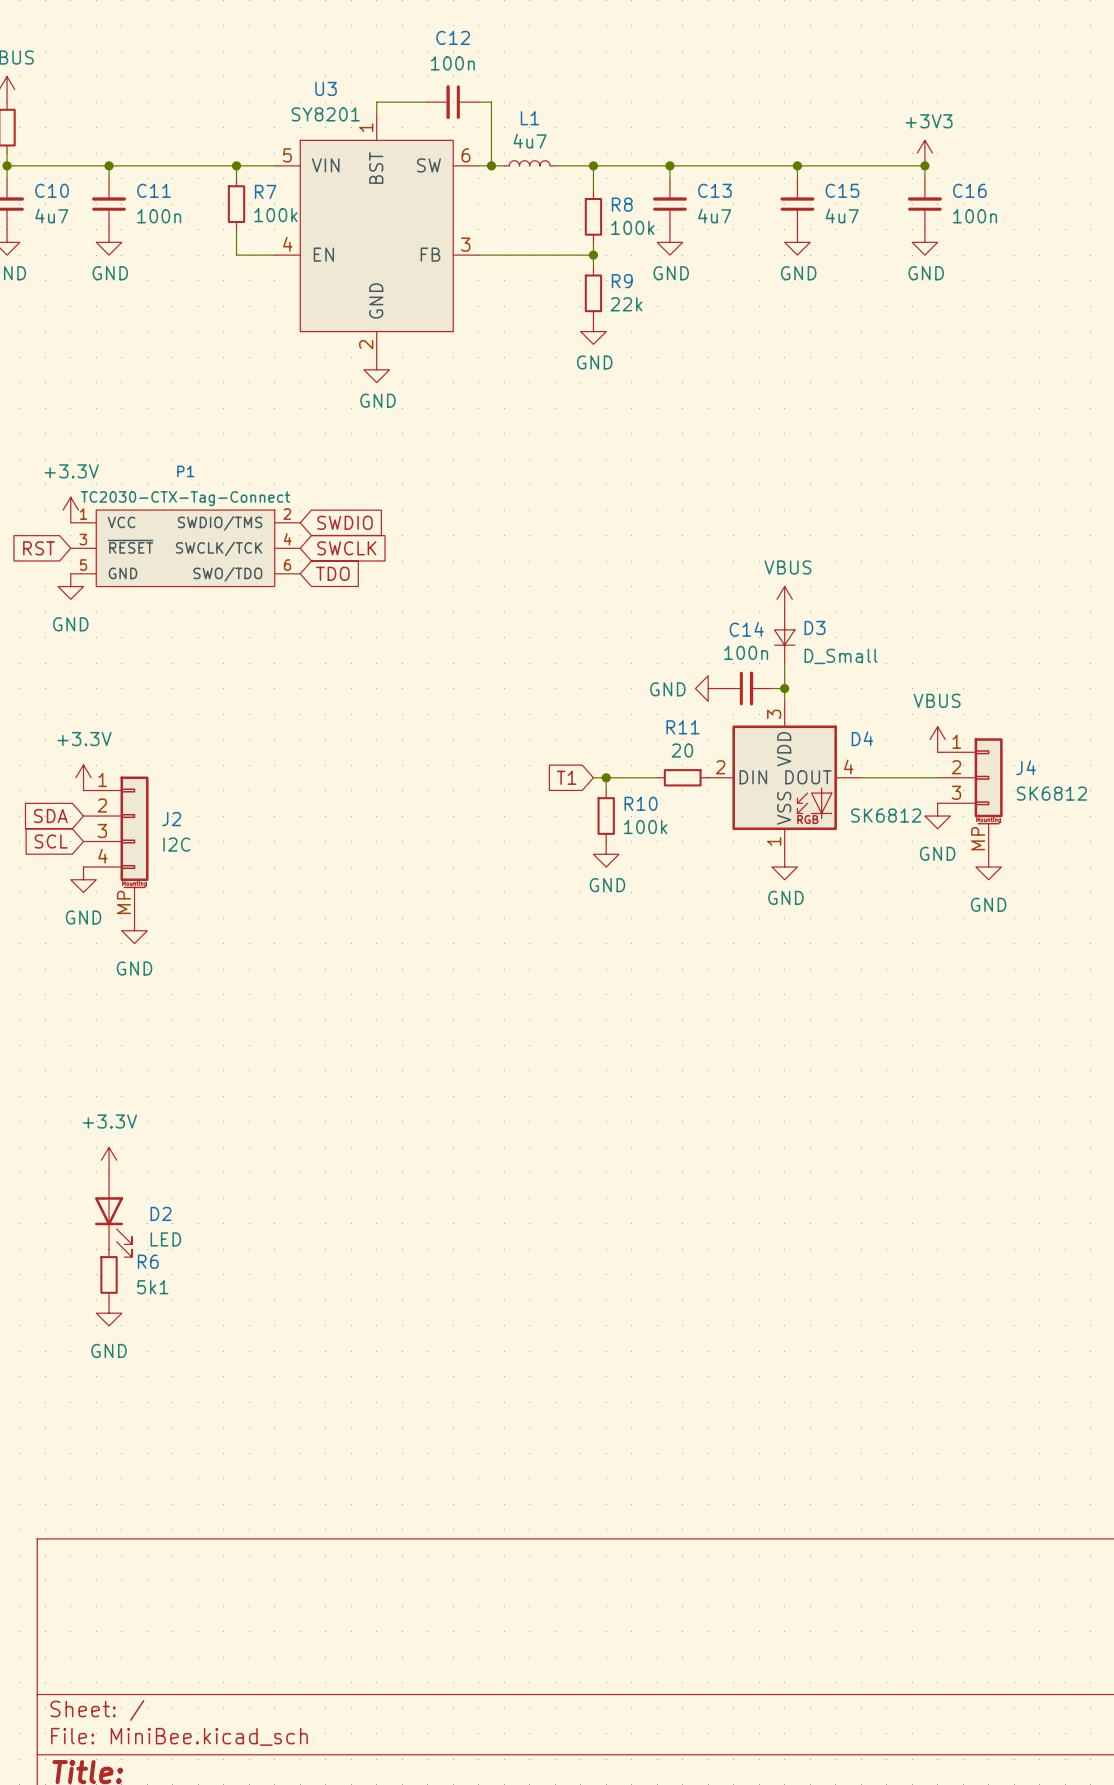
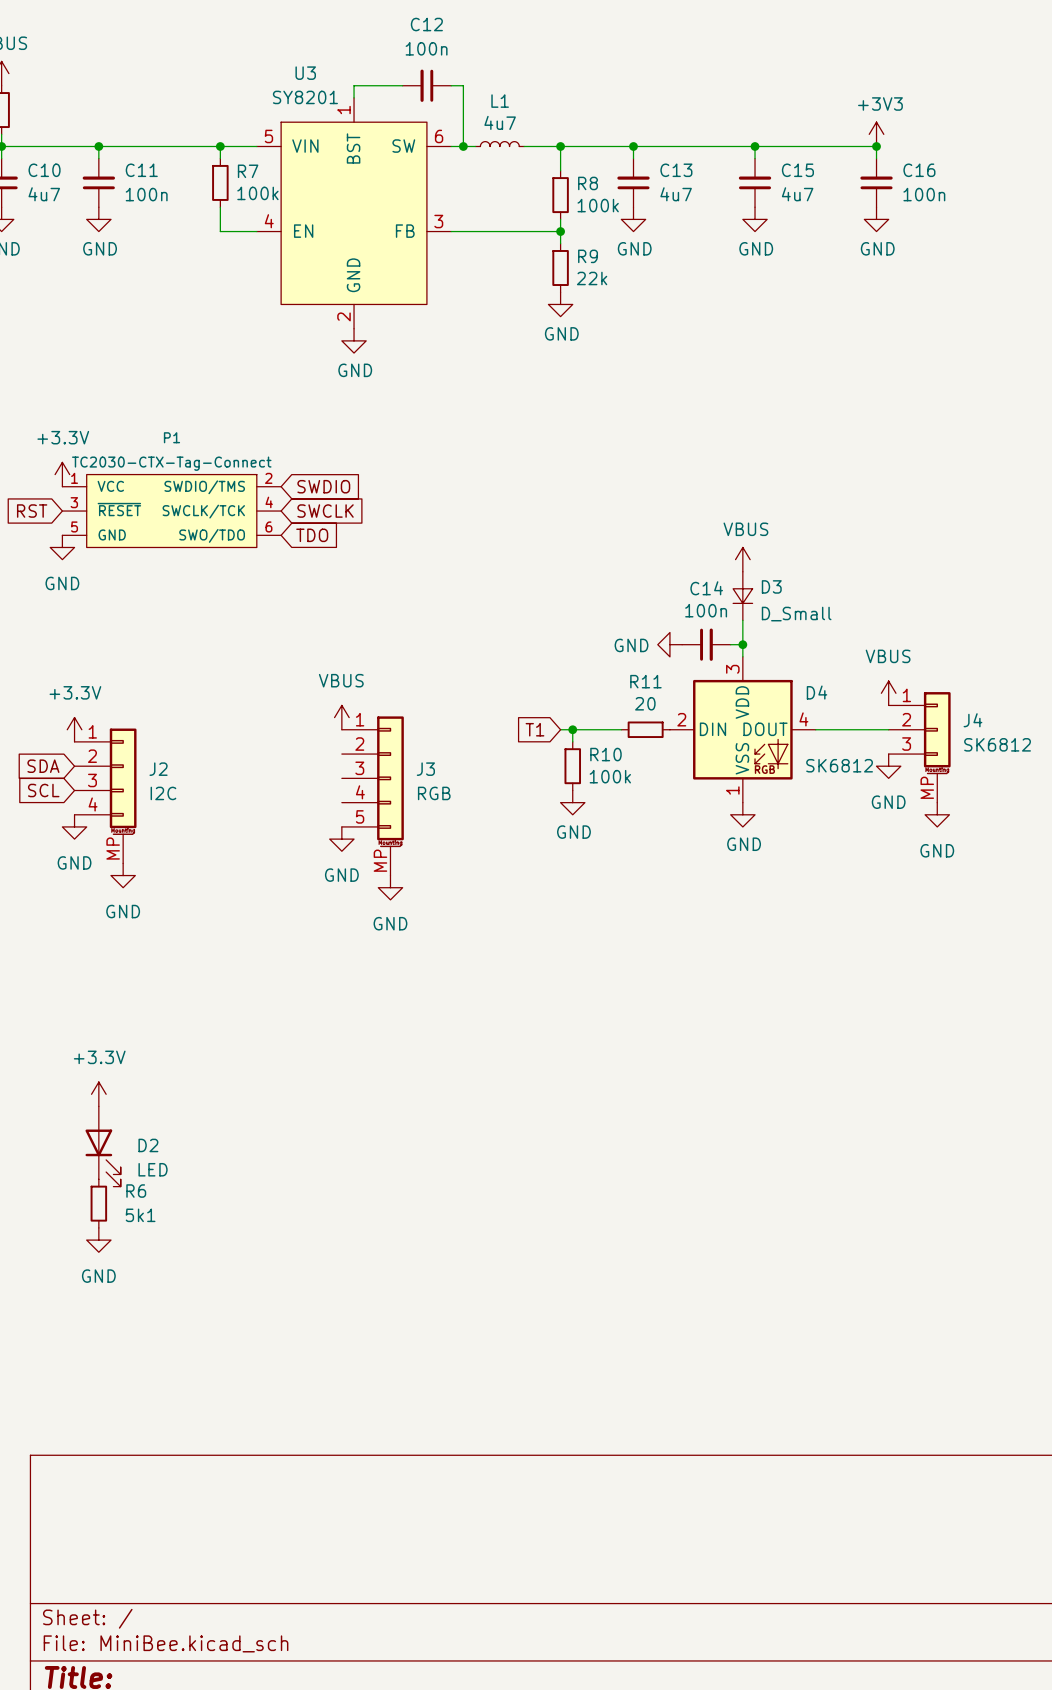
power symbol: none -> VBUS (341, 717)
J3: none -> RGB (372, 795)
power symbol: none -> GND (341, 839)
power symbol: none -> GND (390, 887)

